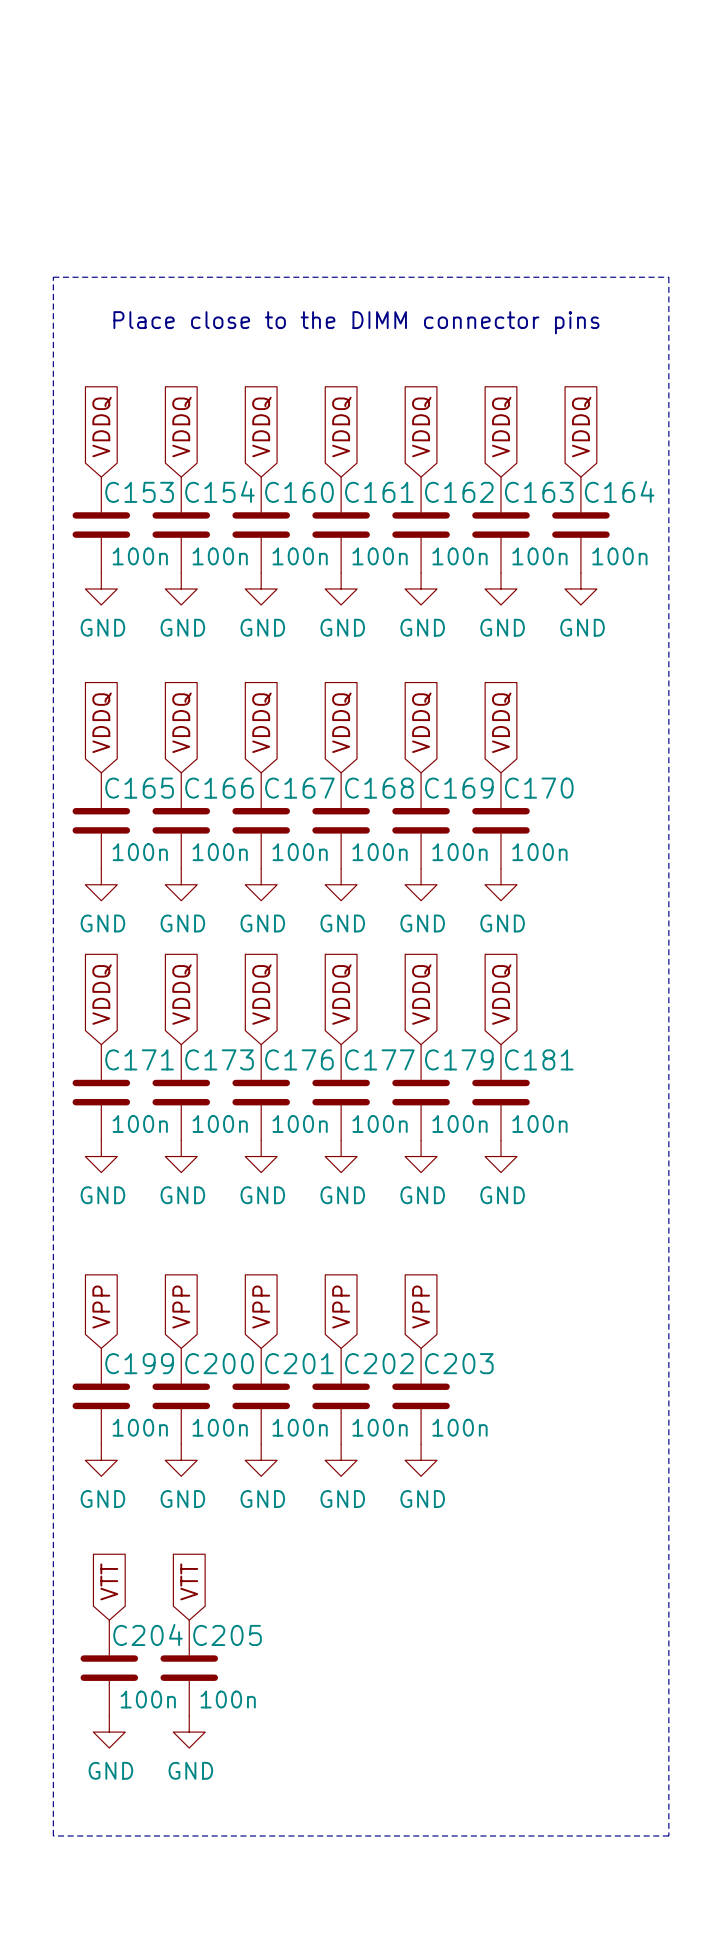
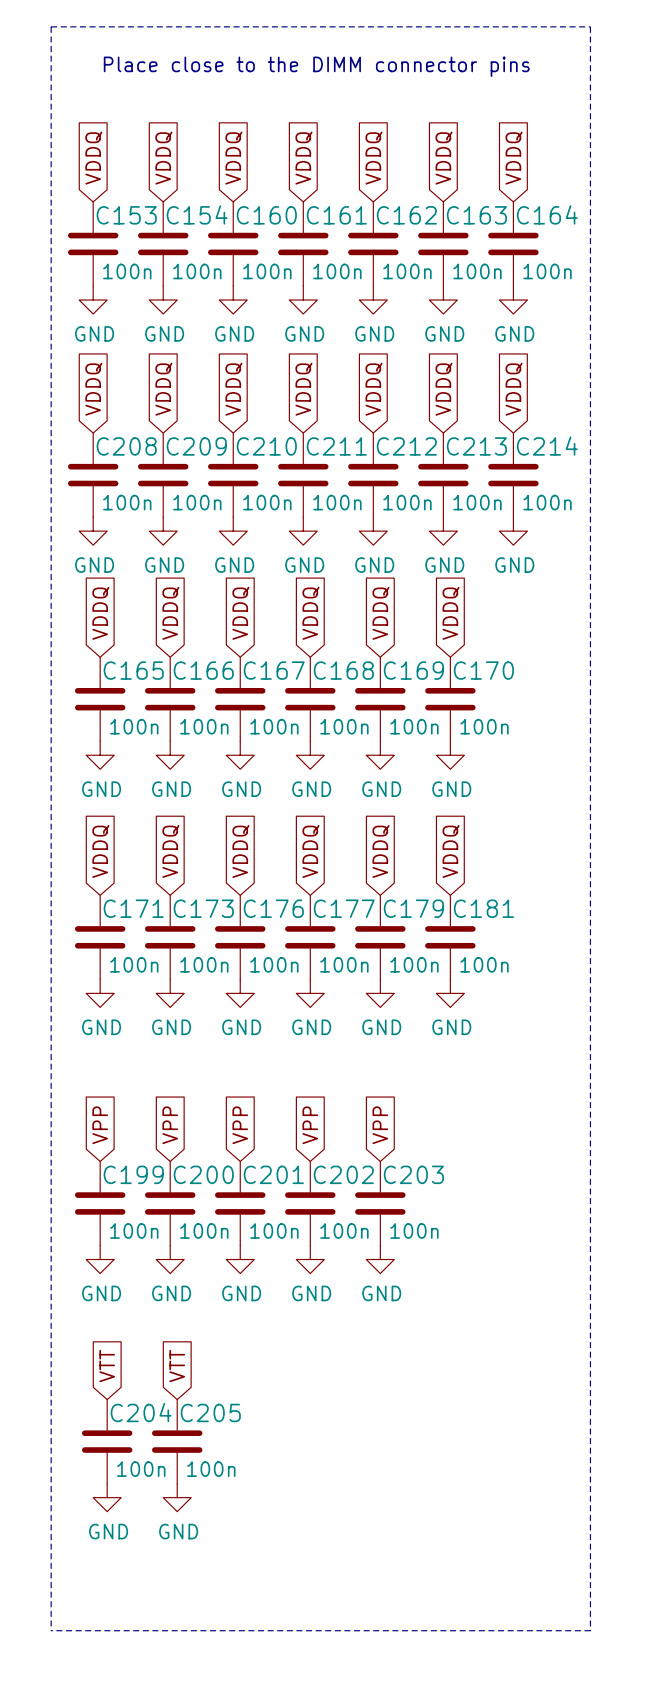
global label: none -> VDDQ (93, 158)
global label: none -> VDDQ (163, 158)
global label: none -> VDDQ (233, 158)
global label: none -> VDDQ (303, 158)
global label: none -> VDDQ (373, 158)
global label: none -> VDDQ (444, 158)
global label: none -> VDDQ (514, 158)
line: (53, 277) (668, 277) (668, 1836) (53, 1836) (53, 277) -> (51, 26) (51, 1630) (590, 1630) (590, 26) (51, 26)
text position: Place close to the DIMM connector pins (356, 322) -> Place close to the DIMM connector pins (316, 66)
power symbol: none -> GND (93, 300)
power symbol: none -> GND (163, 300)
power symbol: none -> GND (233, 300)
power symbol: none -> GND (303, 300)
power symbol: none -> GND (373, 300)
power symbol: none -> GND (443, 300)
power symbol: none -> GND (513, 300)
global label position: VDDQ (102, 427) -> VDDQ (93, 389)
global label position: VDDQ (182, 427) -> VDDQ (163, 389)
global label position: VDDQ (261, 427) -> VDDQ (233, 389)
global label position: VDDQ (341, 427) -> VDDQ (303, 389)
global label position: VDDQ (421, 427) -> VDDQ (373, 389)
global label position: VDDQ (501, 427) -> VDDQ (444, 389)
global label position: VDDQ (581, 427) -> VDDQ (514, 389)
C153 position: (101, 525) -> (93, 243)
C154 position: (181, 525) -> (163, 243)
C160 position: (261, 525) -> (233, 243)
C161 position: (341, 525) -> (303, 243)
C162 position: (421, 525) -> (373, 243)
C163 position: (501, 525) -> (443, 243)
C164 position: (580, 525) -> (513, 243)
C208: none -> (93, 475)
C209: none -> (163, 475)
C210: none -> (233, 475)
C211: none -> (303, 475)
C212: none -> (373, 475)
C213: none -> (443, 475)
C214: none -> (513, 475)
power symbol position: GND (101, 588) -> GND (93, 531)
power symbol position: GND (181, 588) -> GND (163, 531)
power symbol position: GND (261, 588) -> GND (233, 531)
power symbol position: GND (341, 588) -> GND (303, 531)
power symbol position: GND (421, 588) -> GND (373, 531)
power symbol position: GND (501, 588) -> GND (443, 531)
power symbol position: GND (580, 588) -> GND (513, 531)

